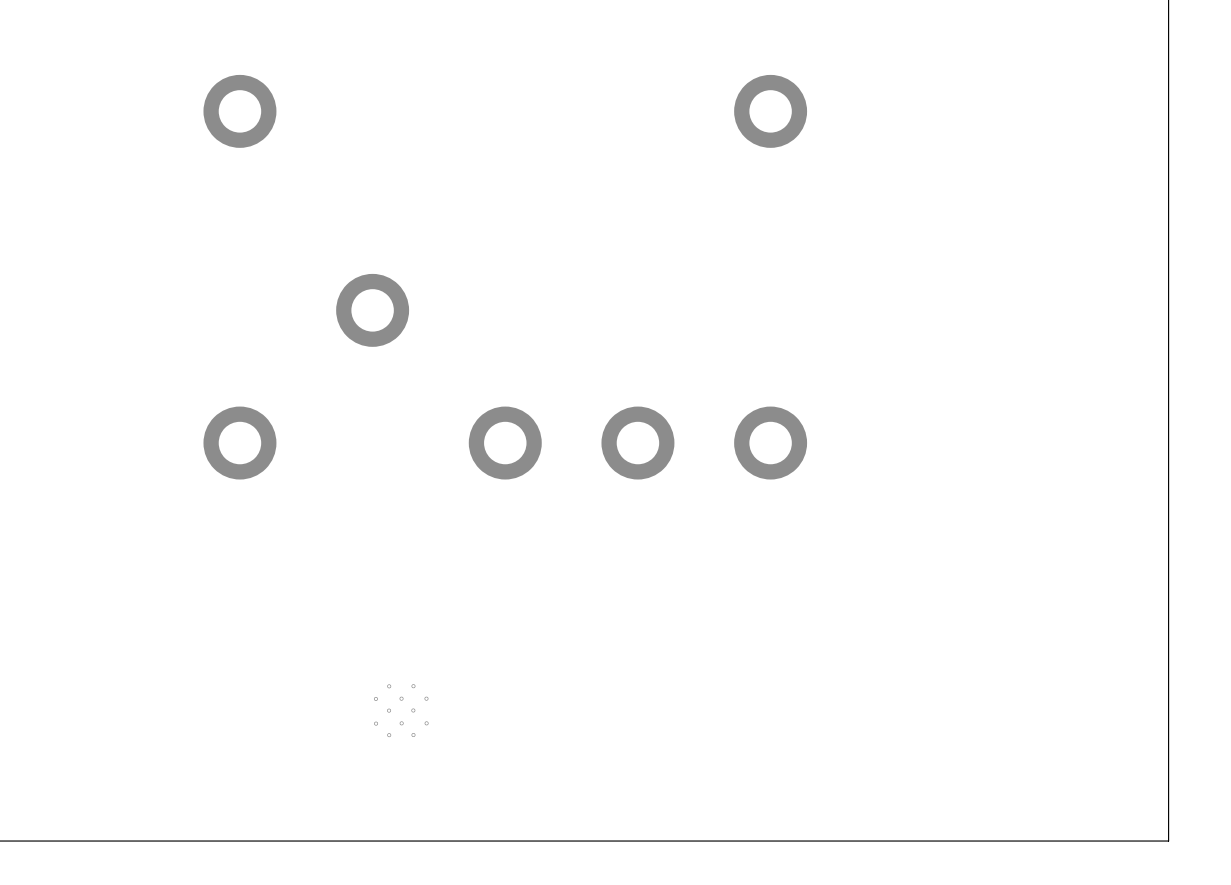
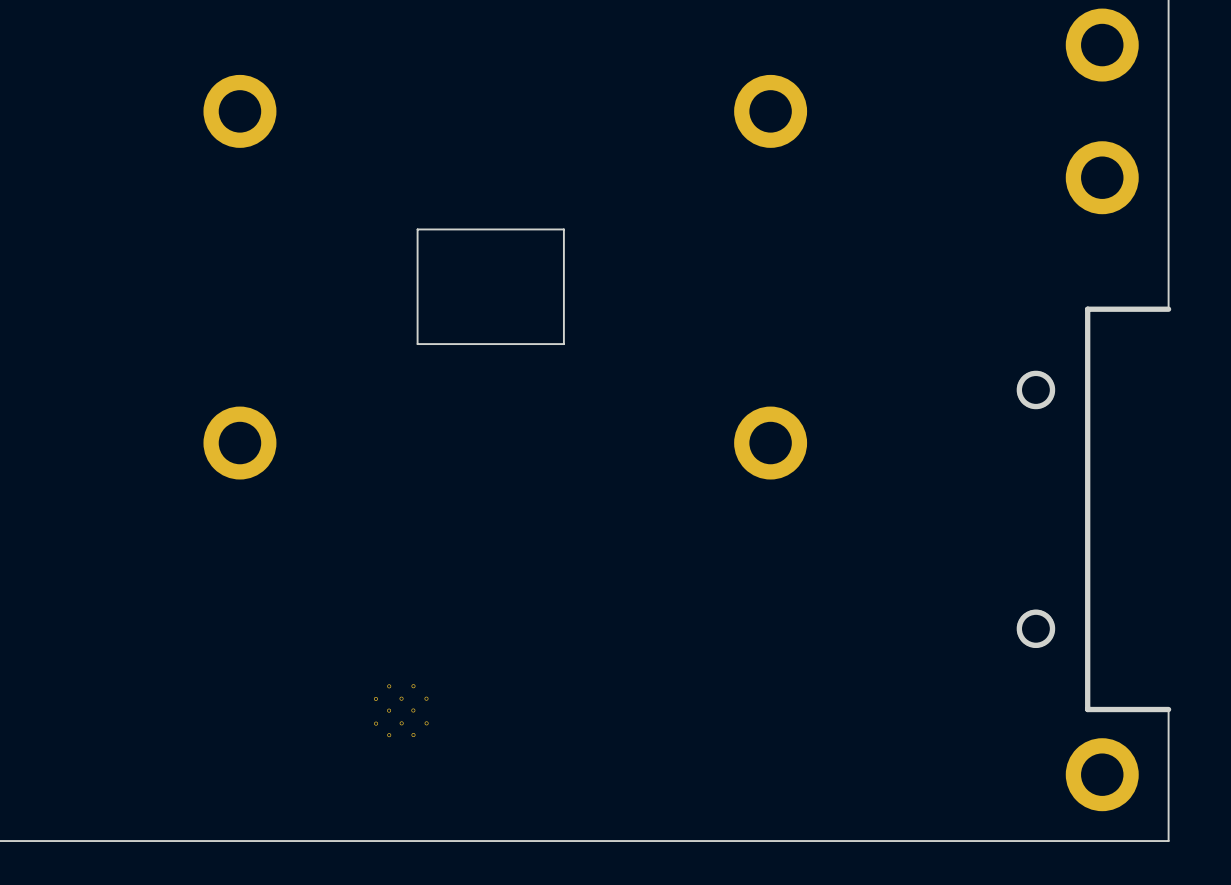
part: none -> (1102, 45)
part: none -> (1102, 177)
board edge: none -> (563, 229) (417, 229) (417, 344) (563, 344) (563, 229)
board edge: (1168, 309) (1168, 709) -> (1168, 309) (1087, 309) (1087, 709) (1168, 709)
part: (372, 310) -> none
round board edge: none -> [1016, 370, 1056, 410]
part: (505, 443) -> none
part: (637, 443) -> none
round board edge: none -> [1016, 609, 1056, 649]
part: none -> (1102, 774)

